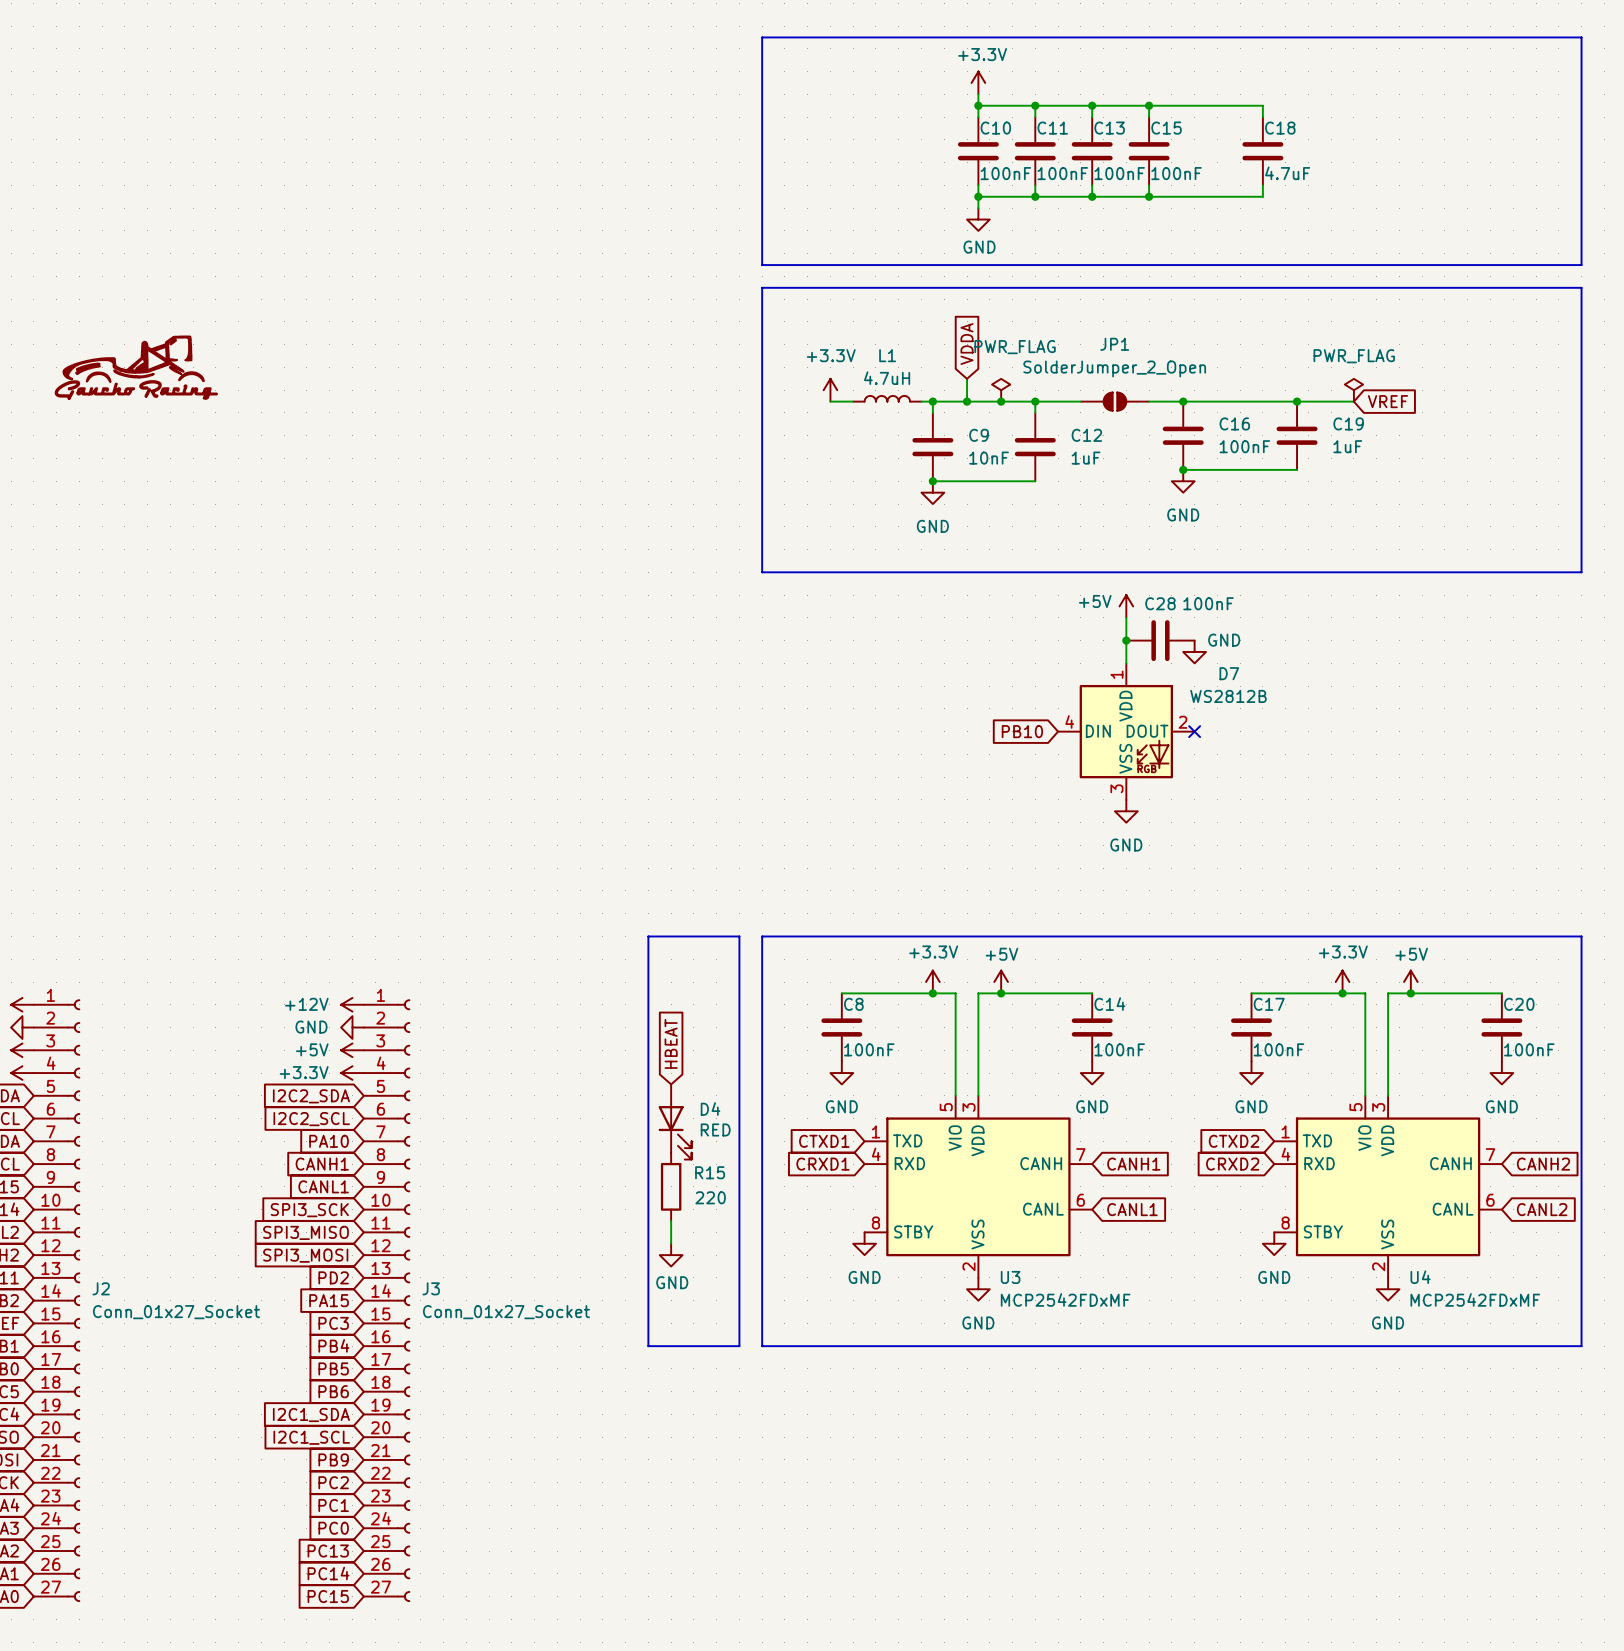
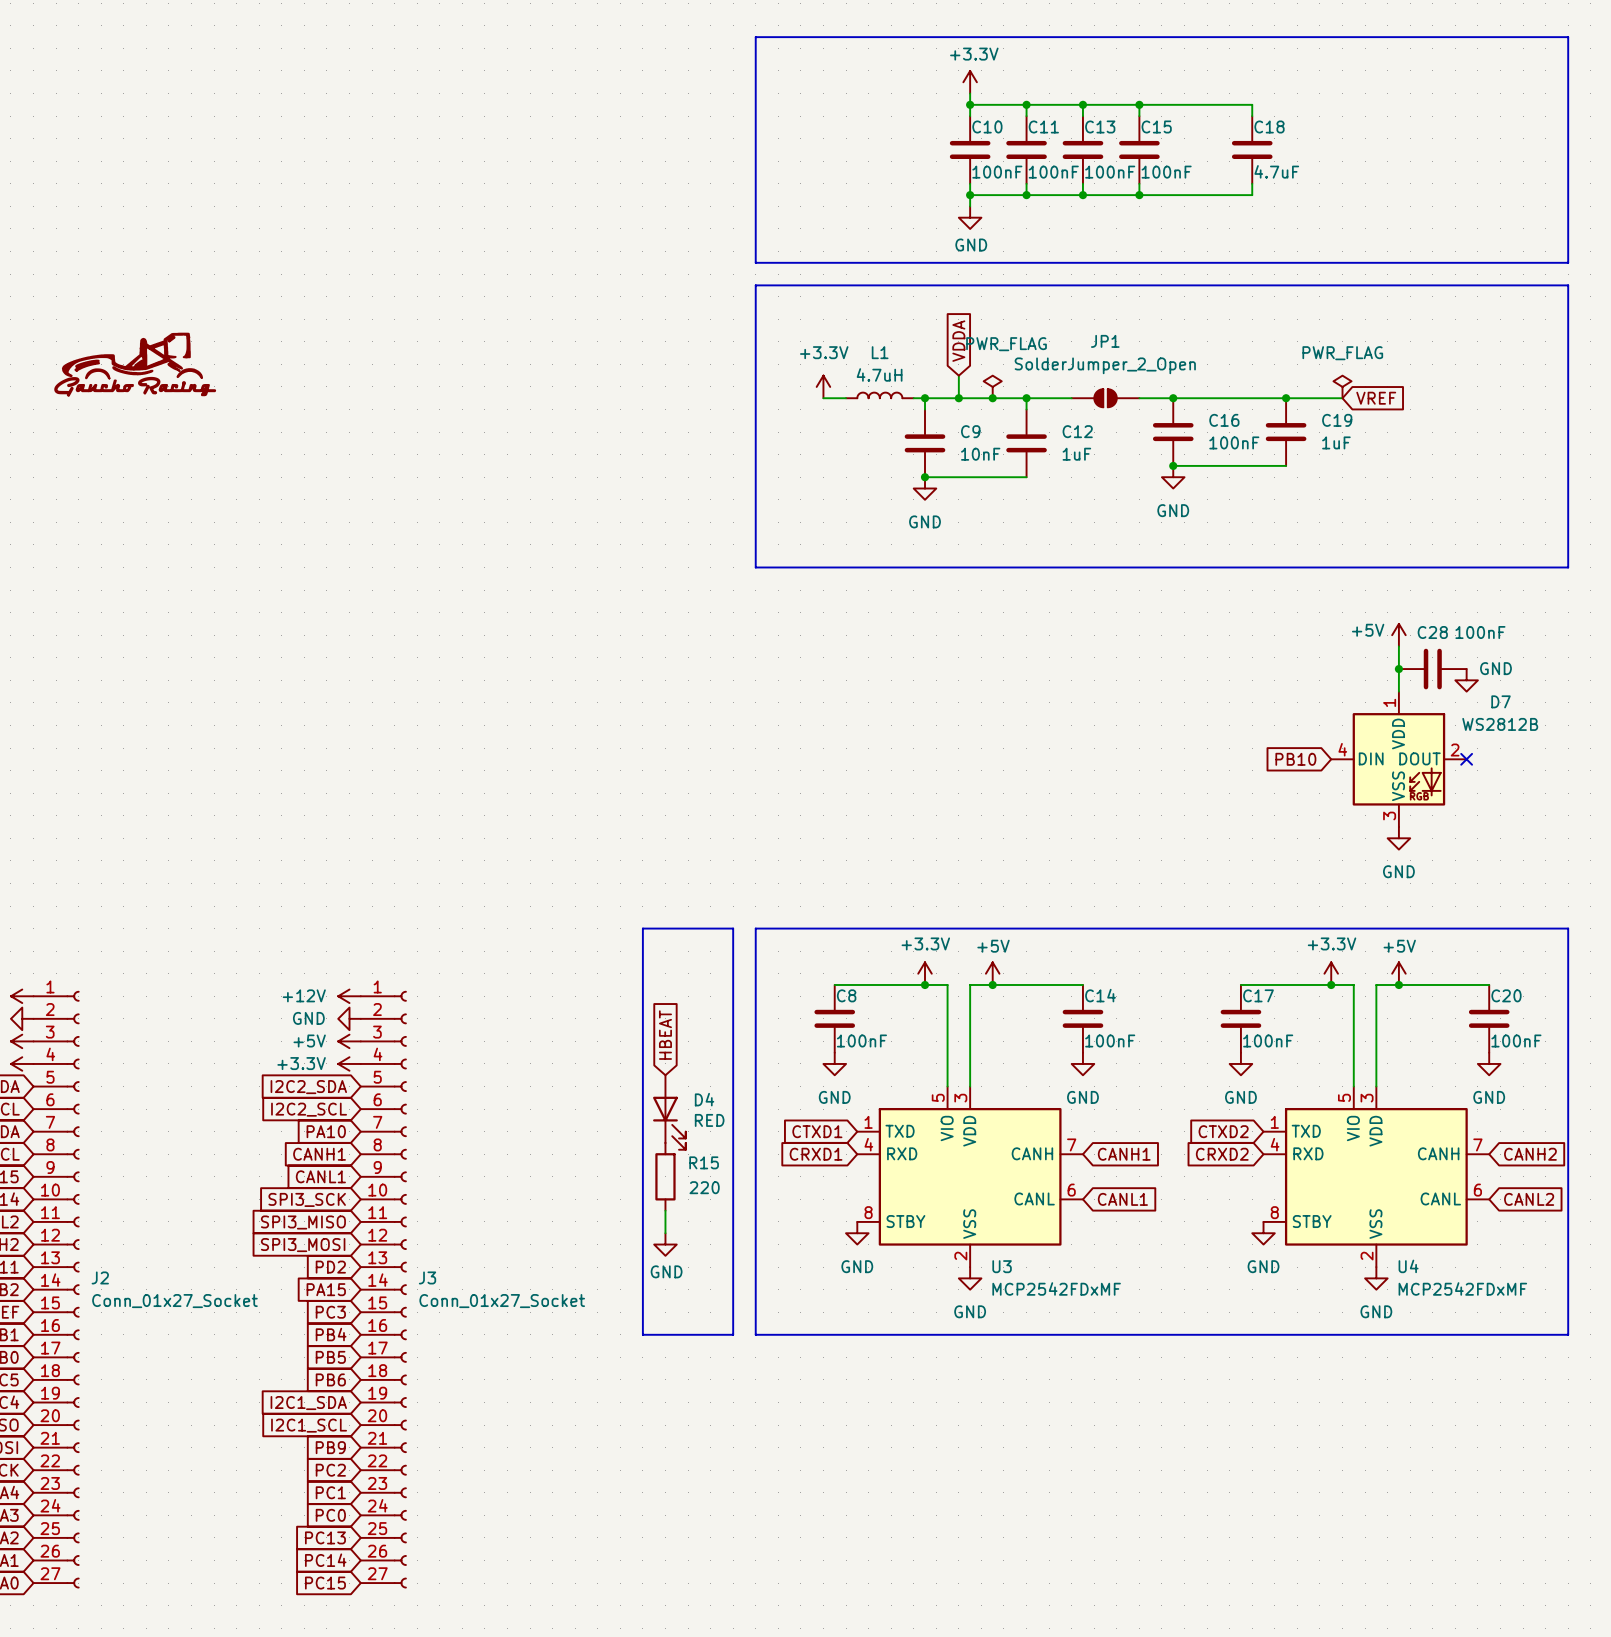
power symbol: +5V (1126, 606) -> none
wire: (1126, 617) (1126, 663) -> none
junction: (1126, 640) -> none
C28 position: (1160, 640) -> (1432, 669)
power symbol: none -> +5V (1398, 635)
power symbol: GND (1194, 651) -> none
wire: none -> (1398, 646) (1398, 691)
junction: none -> (1398, 669)
power symbol: none -> GND (1466, 680)
global label: PB10 (1022, 731) -> none
D7 position: (1126, 731) -> (1398, 759)
no-connect mark: (1194, 731) -> none
global label: none -> PB10 (1295, 759)
no-connect mark: none -> (1466, 759)
power symbol: GND (1126, 811) -> none
power symbol: none -> GND (1398, 838)

